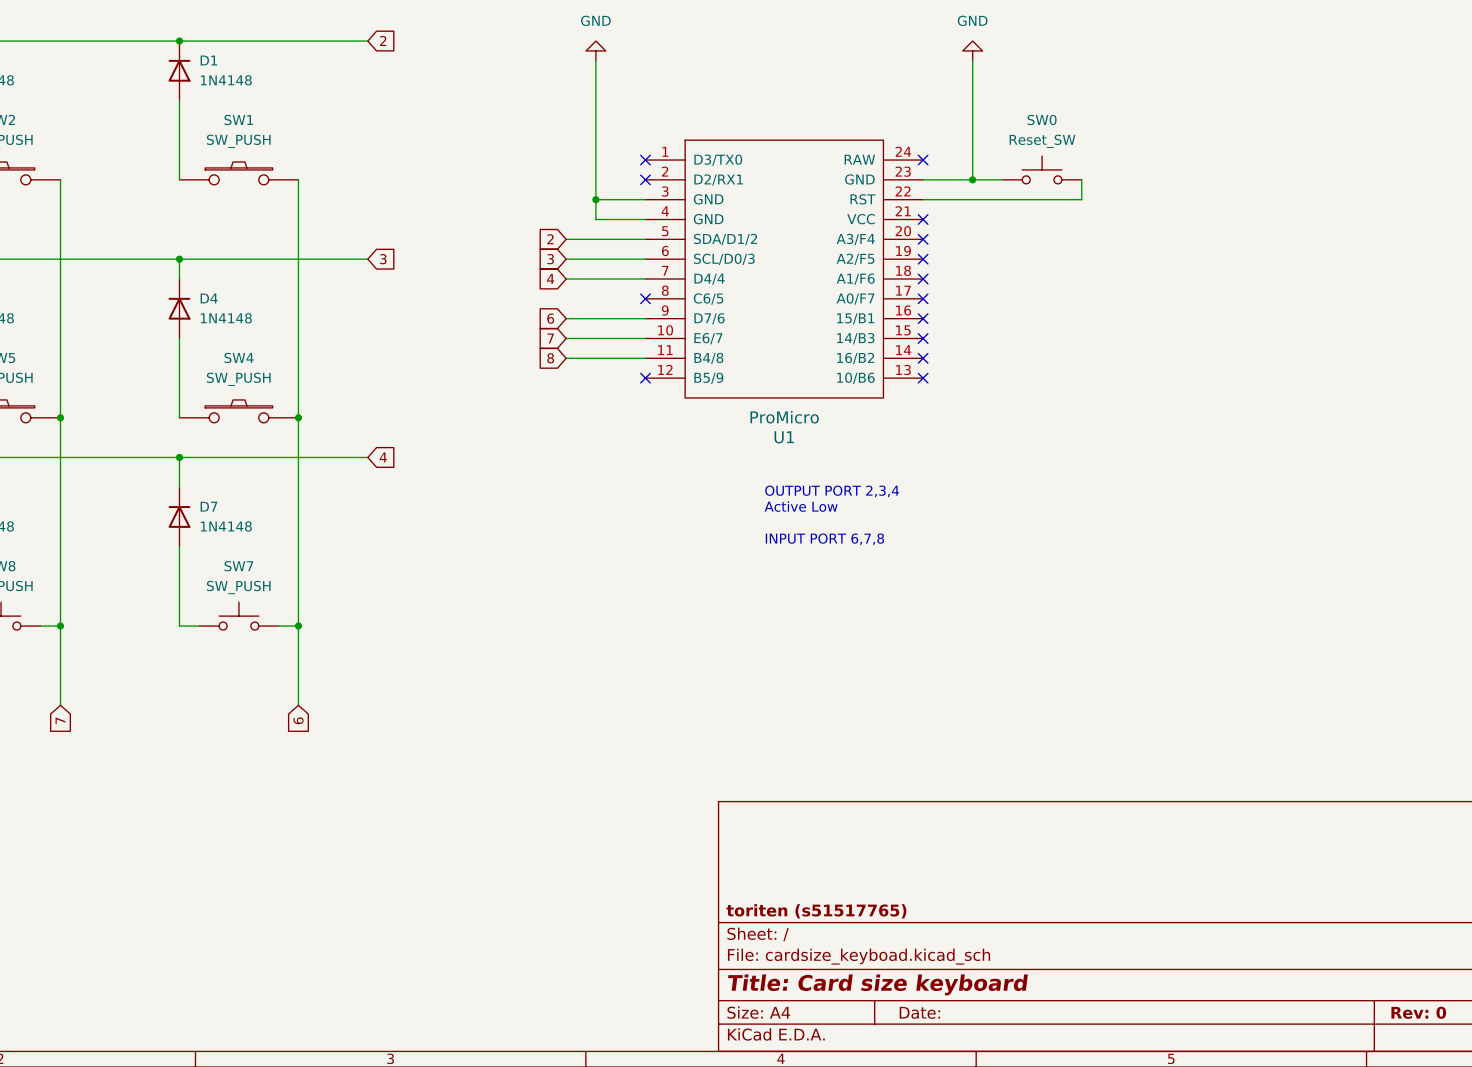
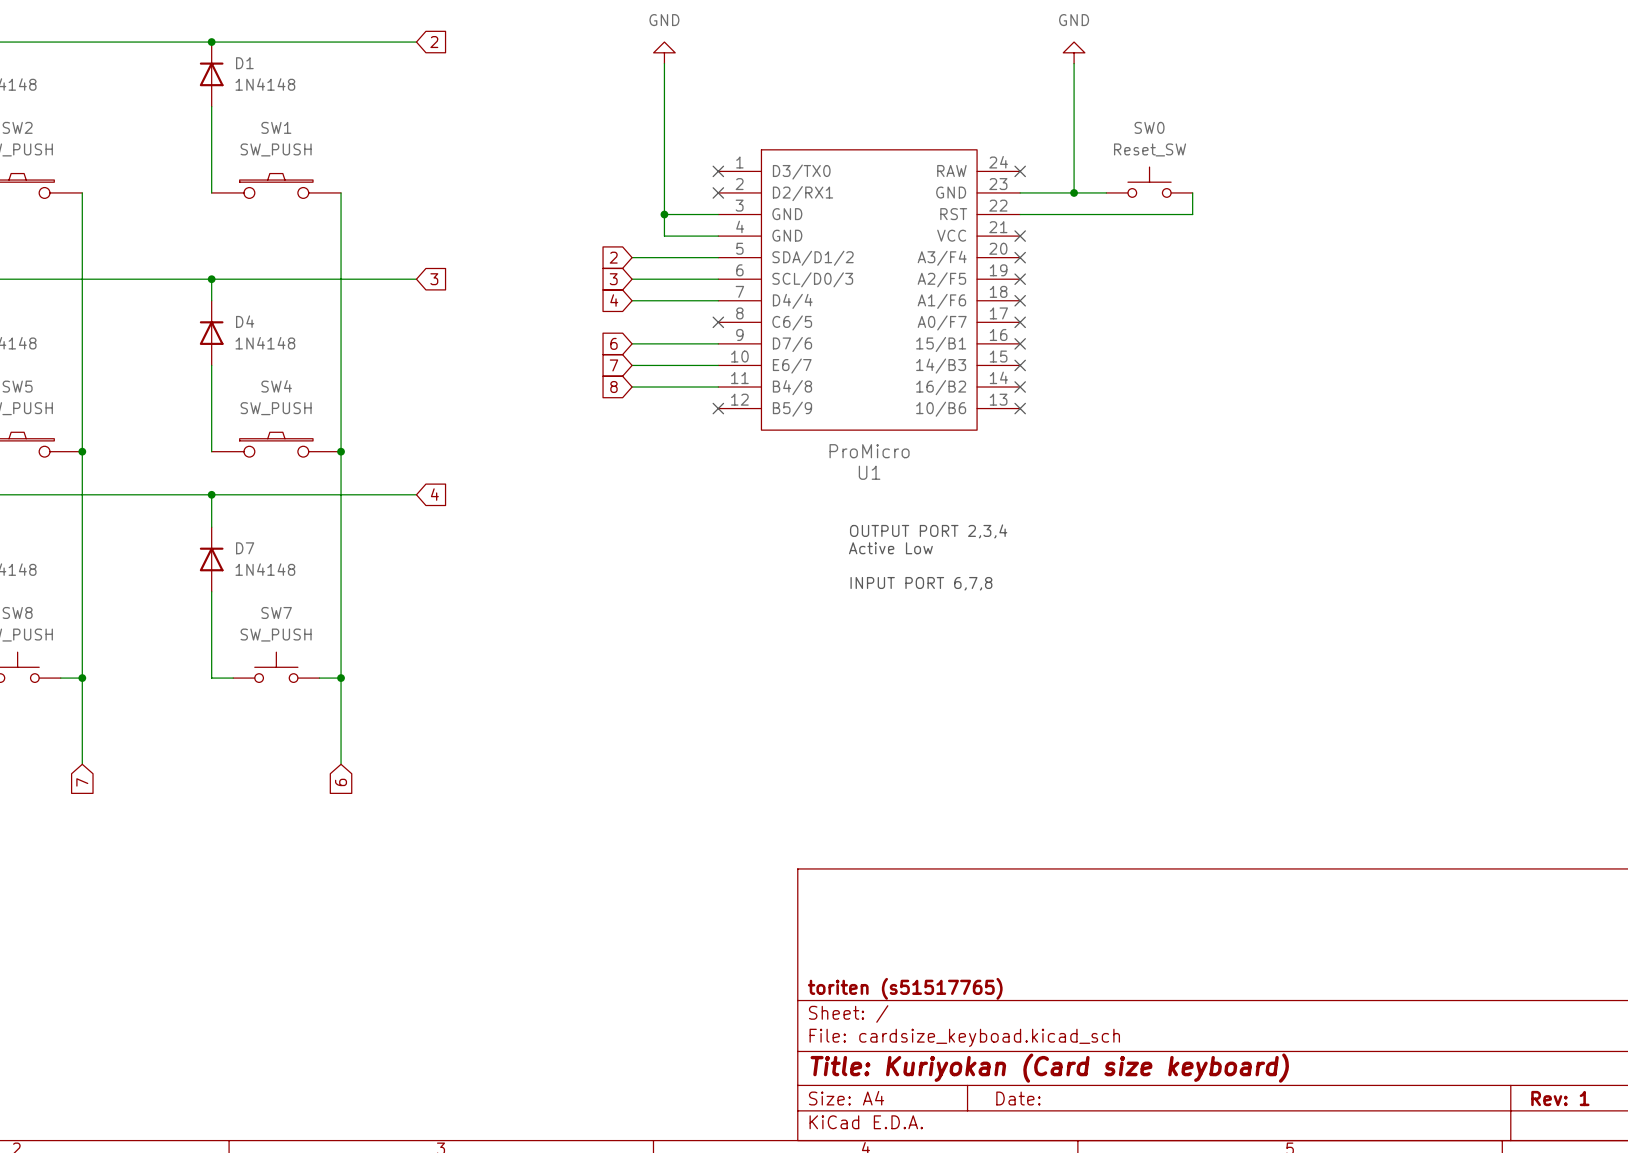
title block: Title: Card size keyboard (877, 984) -> Title: Kuriyokan (Card size keyboard) (1049, 1068)
title block: Rev: 0 (1418, 1012) -> Rev: 1 (1560, 1098)

